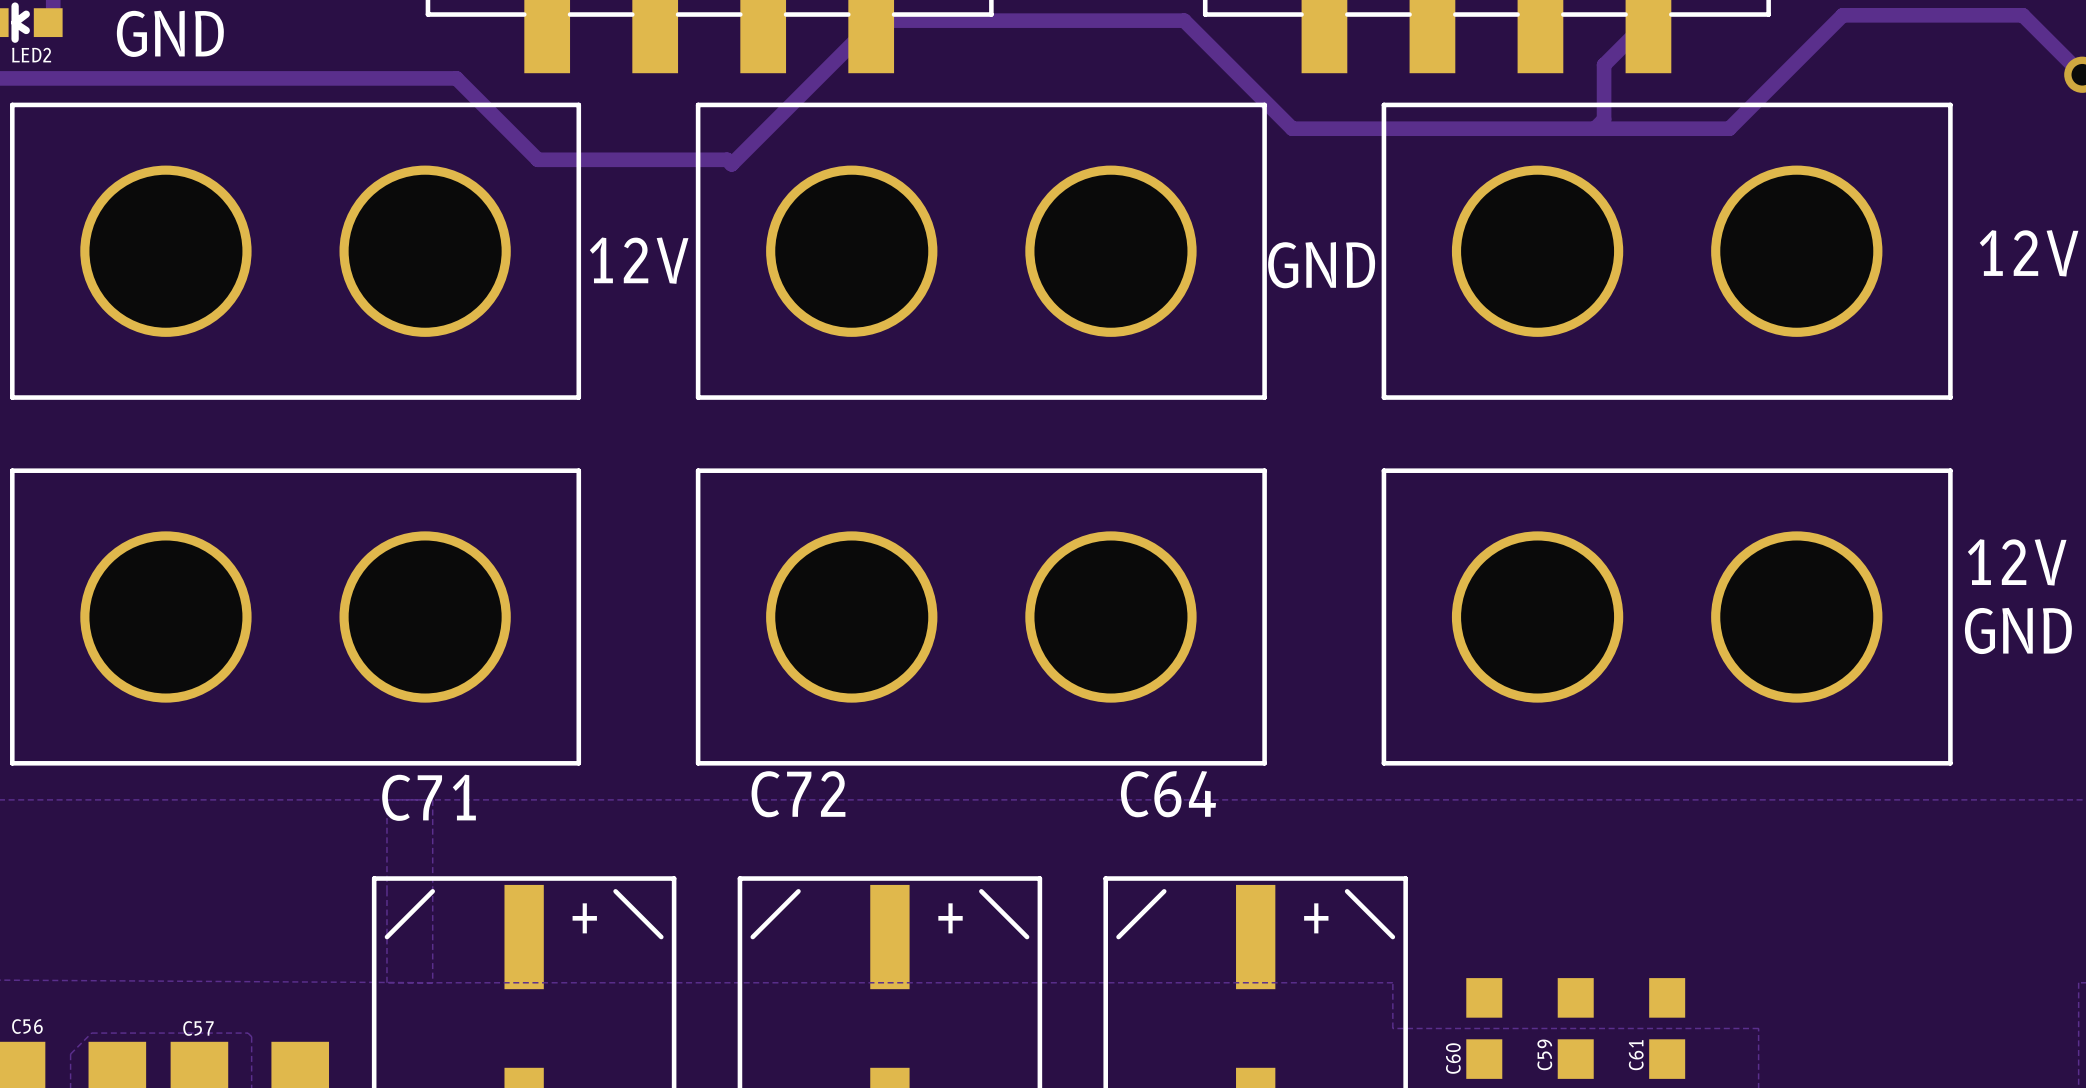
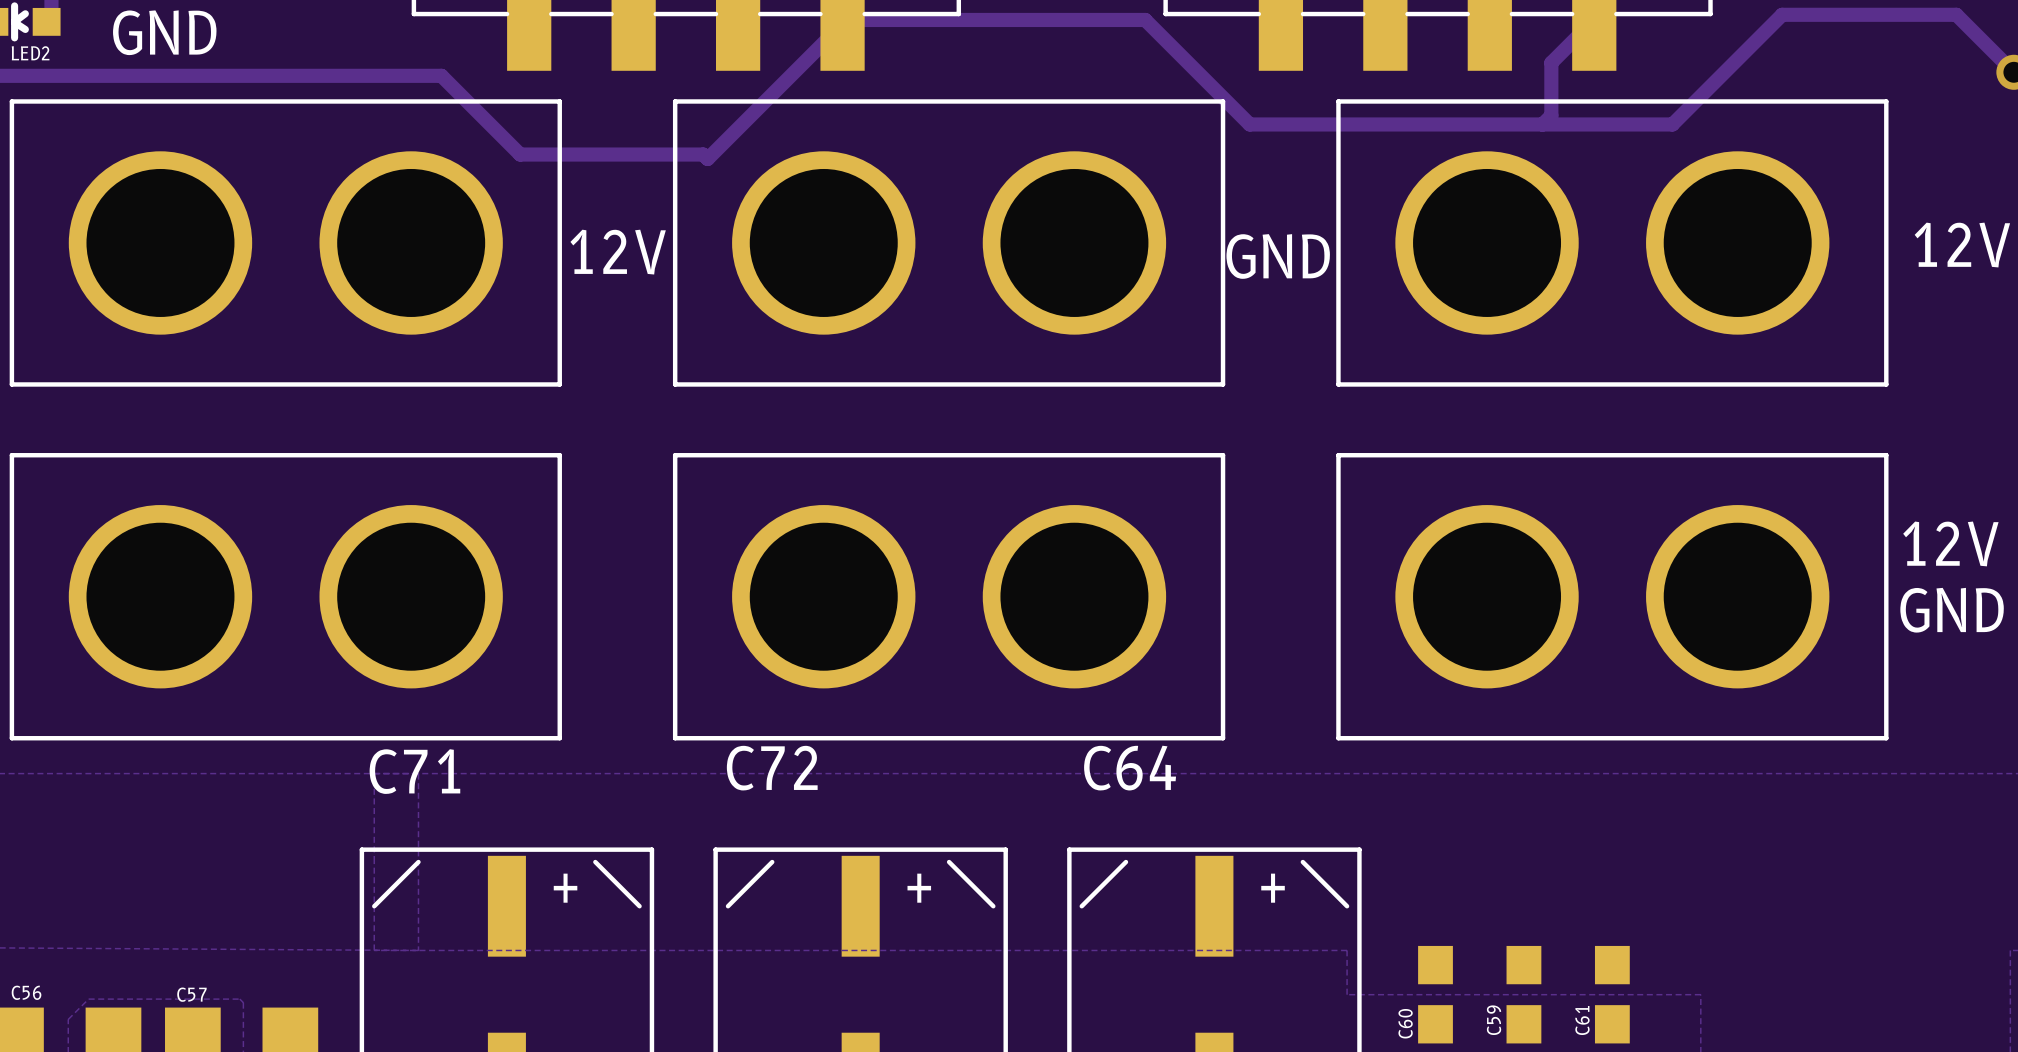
part footprint: [10, 102, 582, 400] -> [9, 99, 562, 387]
part footprint: [695, 102, 1267, 400] -> [672, 99, 1226, 387]
part footprint: [1381, 102, 1953, 400] -> [1336, 99, 1889, 387]
part footprint: [10, 468, 582, 766] -> [9, 453, 562, 741]
part footprint: [695, 468, 1267, 766] -> [672, 453, 1226, 741]
part footprint: [1381, 468, 1953, 766] -> [1336, 453, 1889, 741]

